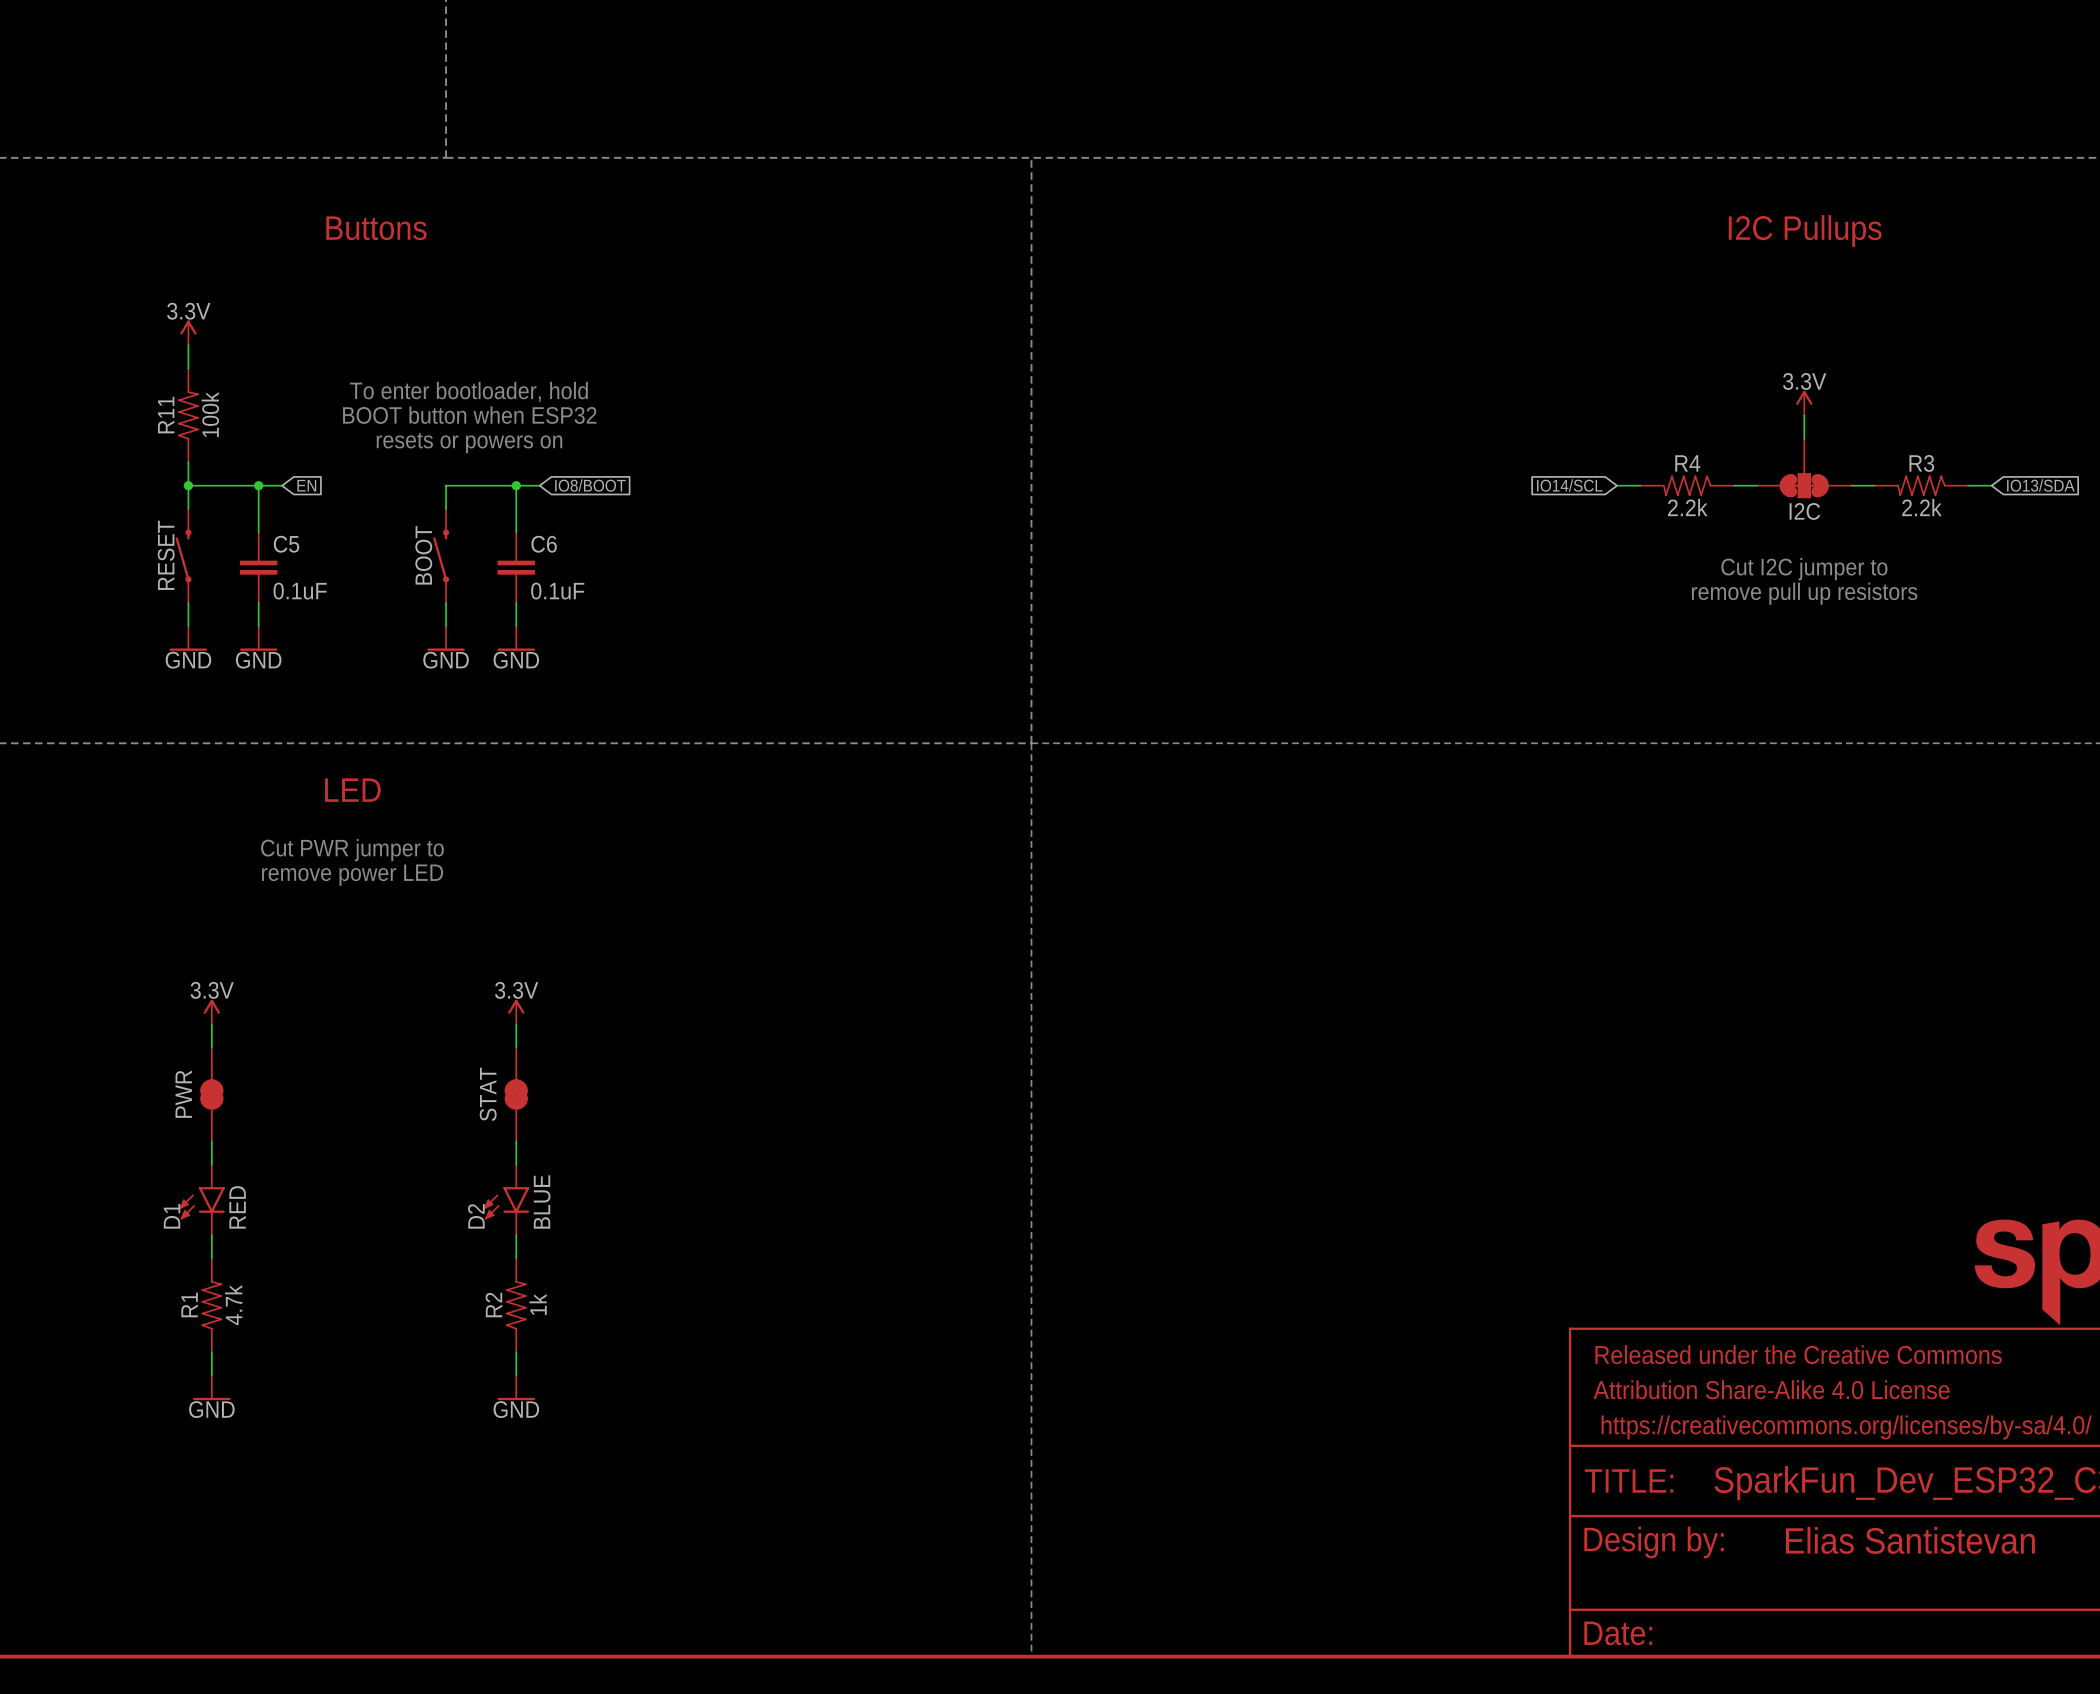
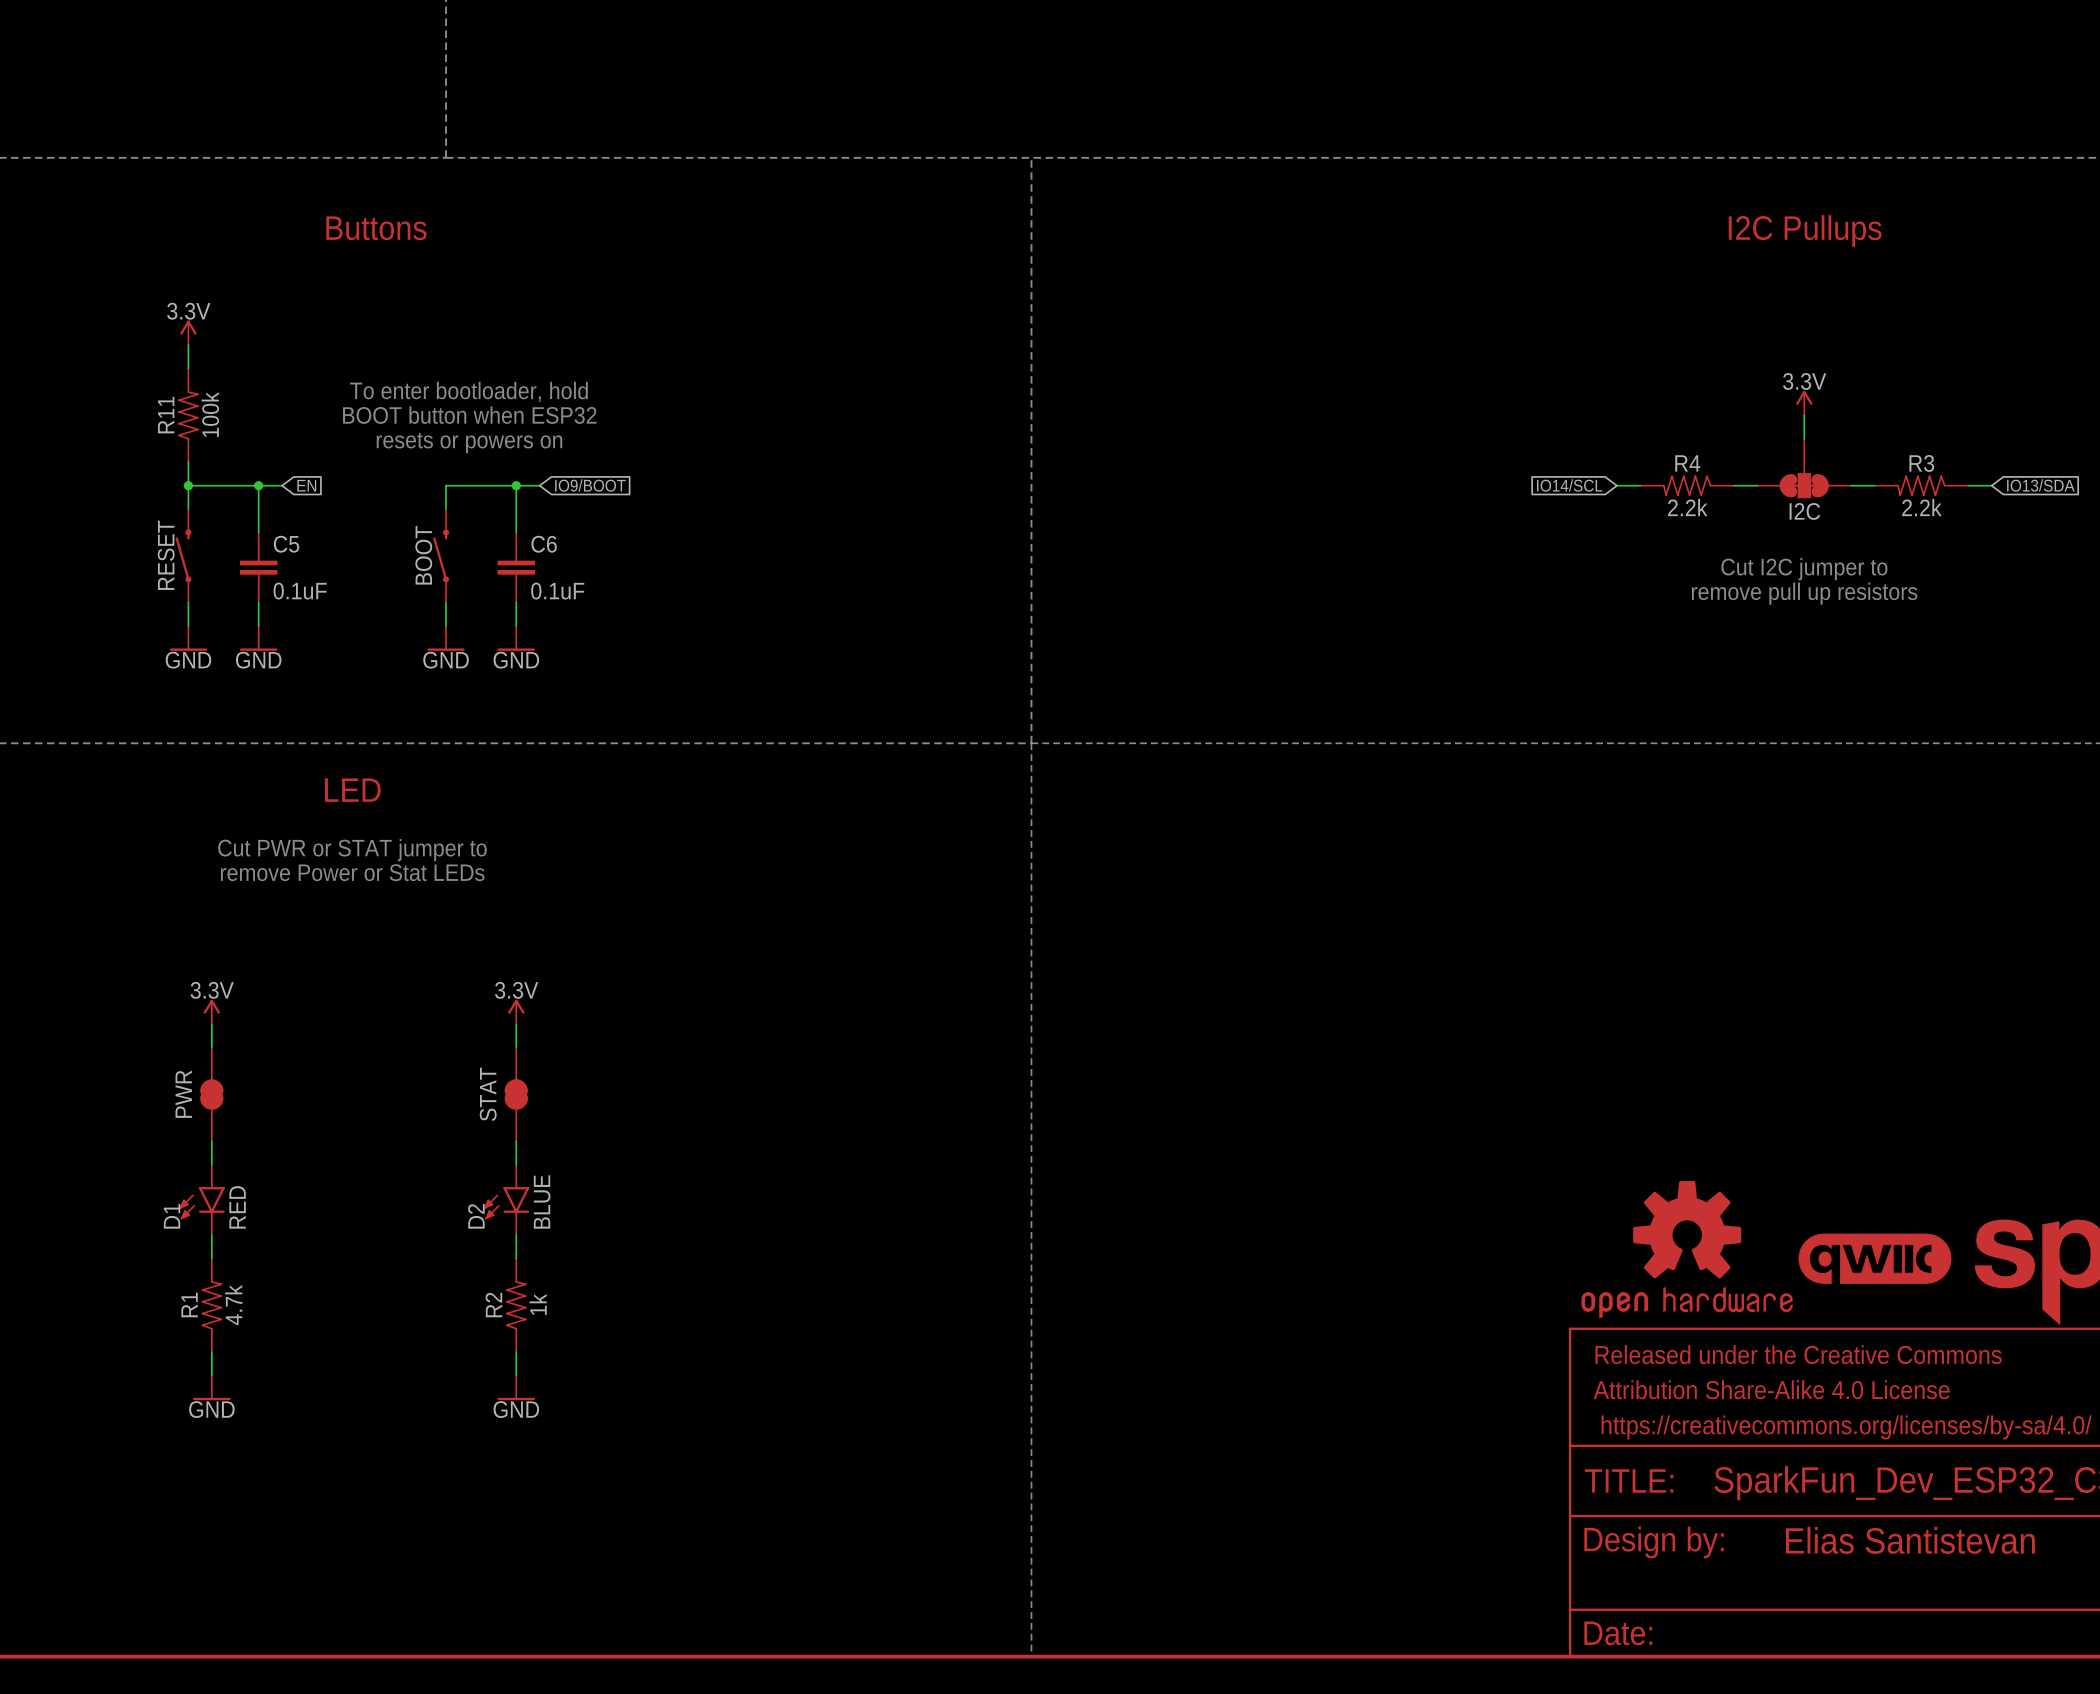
global label: IO8/BOOT (590, 485) -> IO9/BOOT (590, 485)
text: Cut PWR jumper to (352, 850) -> Cut PWR or STAT jumper to (352, 850)
text: remove power LED (352, 875) -> remove Power or Stat LEDs (352, 872)
part: none -> (1687, 1249)
part: none -> (1874, 1258)

